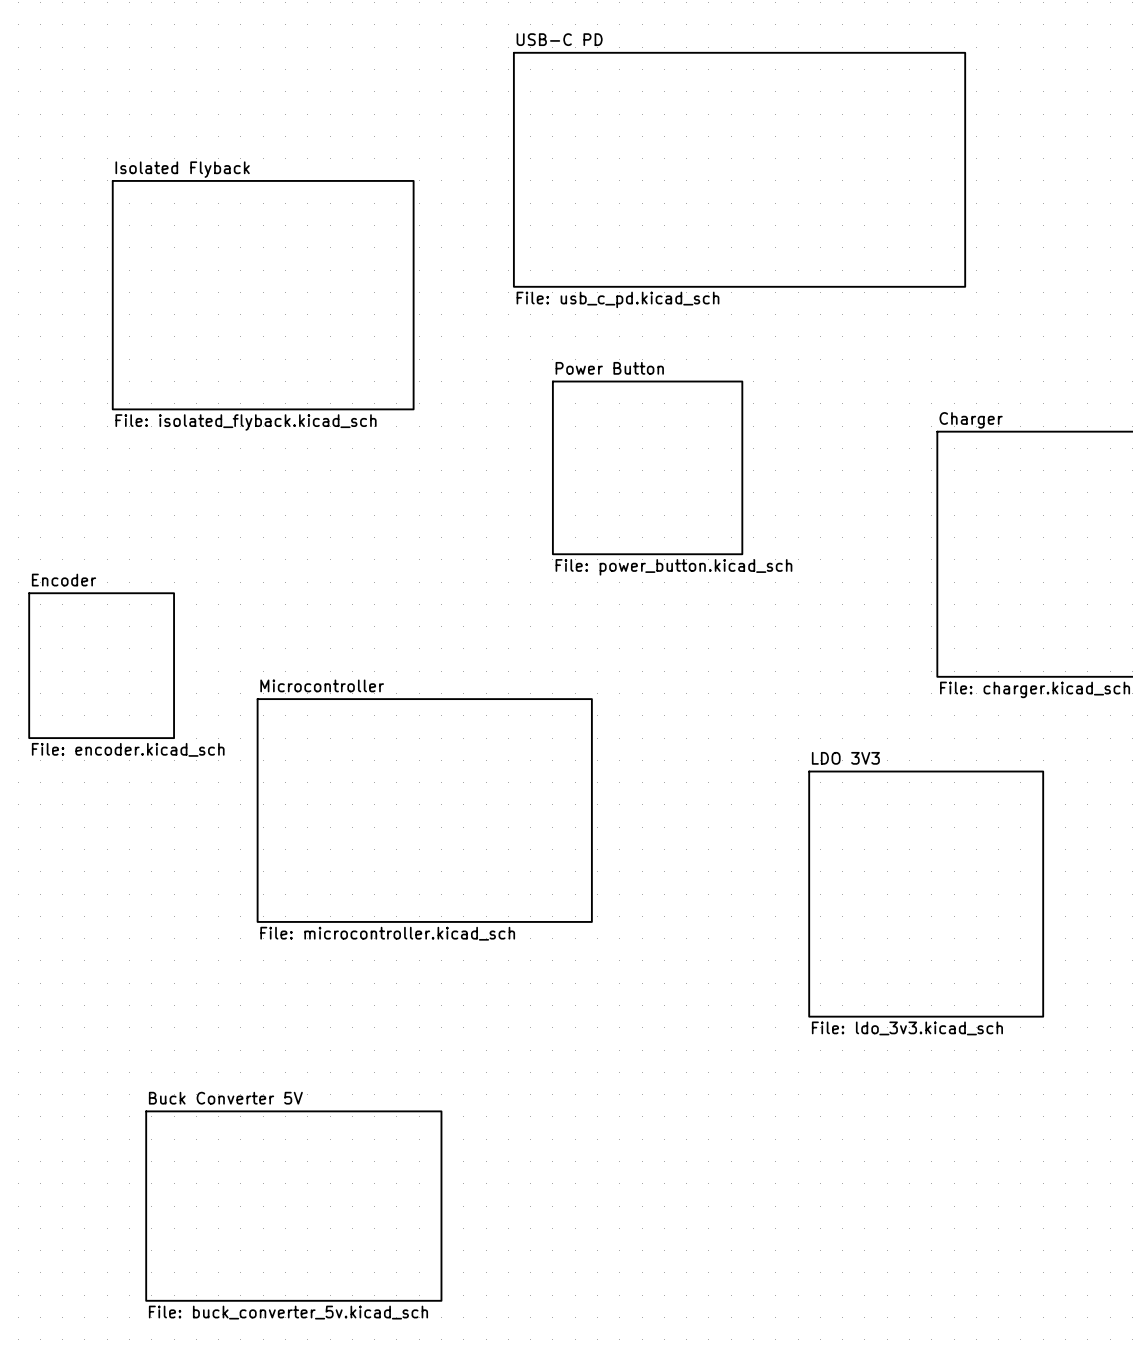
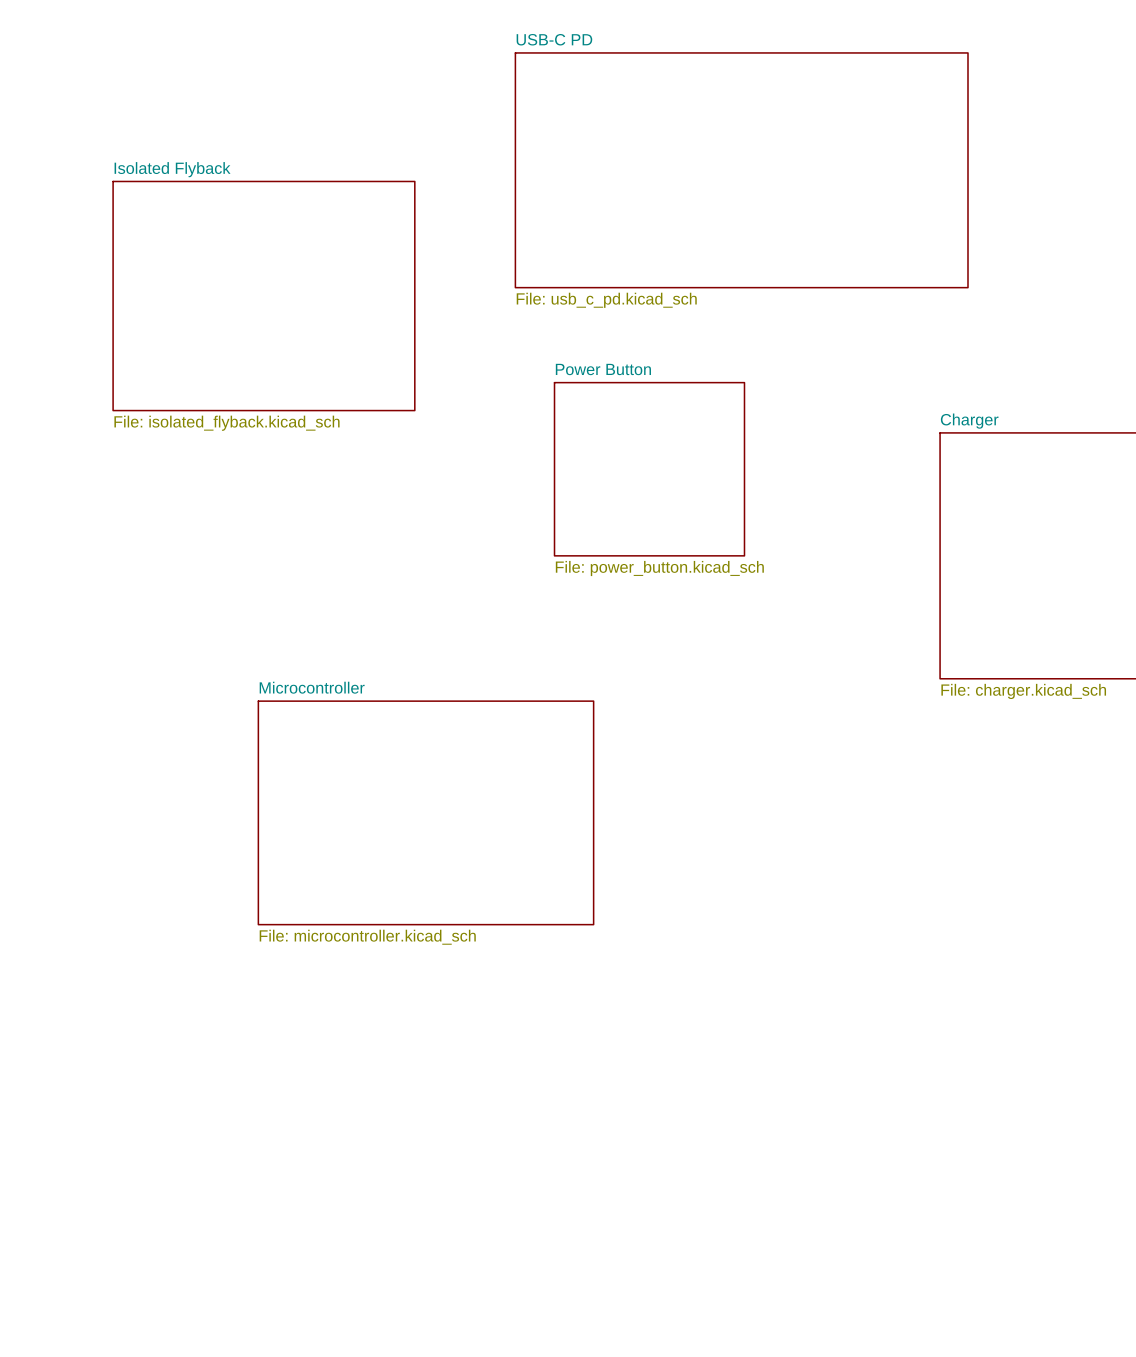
sheet Encoder: File: encoder.kicad_sch (101, 665) -> none
sheet LDO 3V3: File: ldo_3v3.kicad_sch (926, 894) -> none
sheet Buck Converter 5V: File: buck_converter_5v.kicad_sch (293, 1206) -> none

